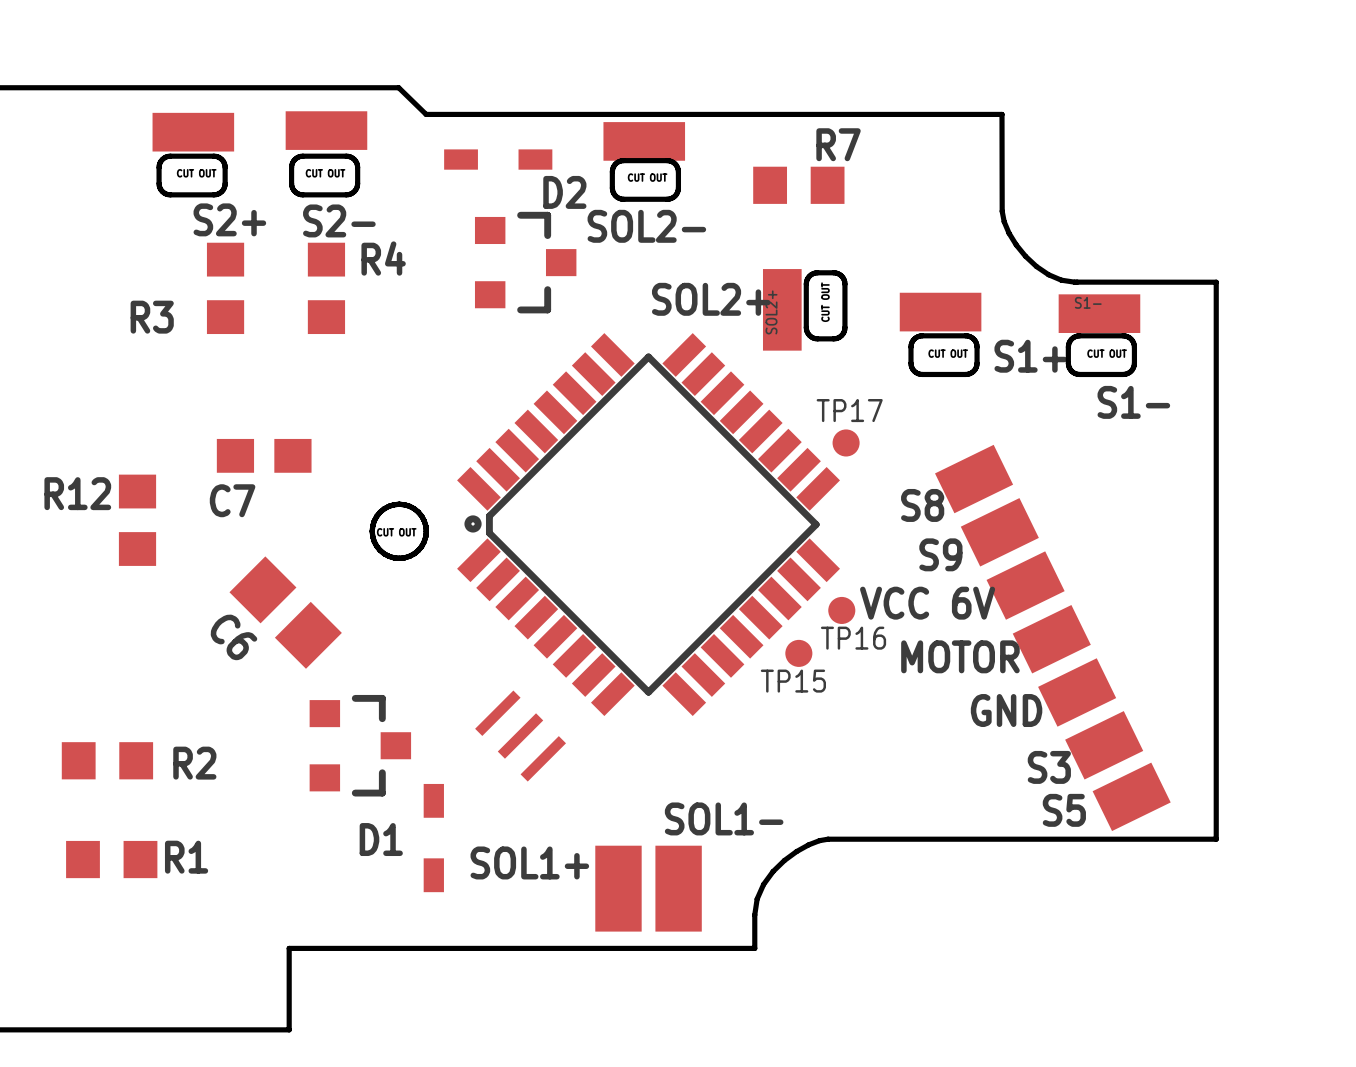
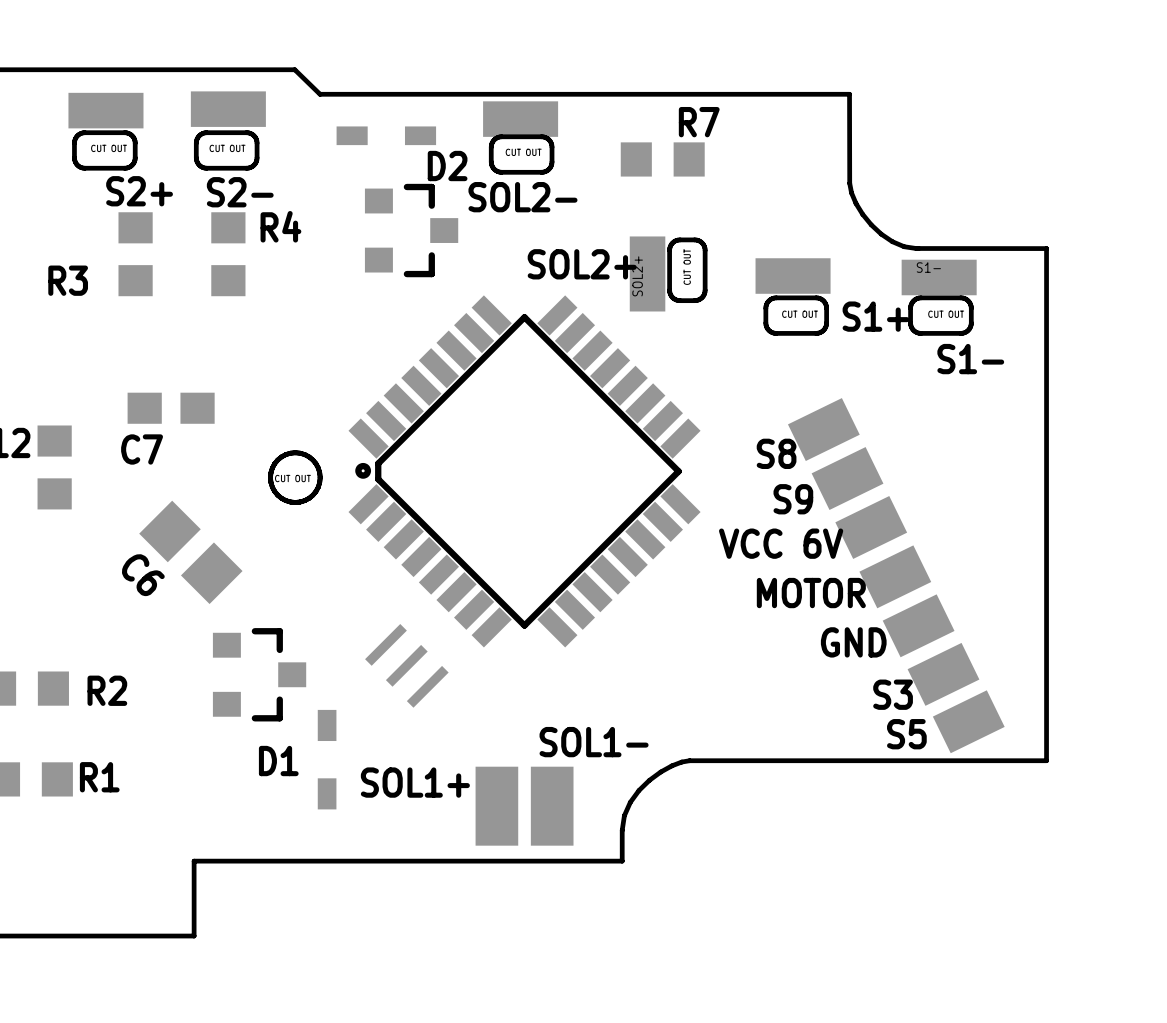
TP17: (846, 442) -> none
TP16: (841, 610) -> none
TP15: (798, 653) -> none

